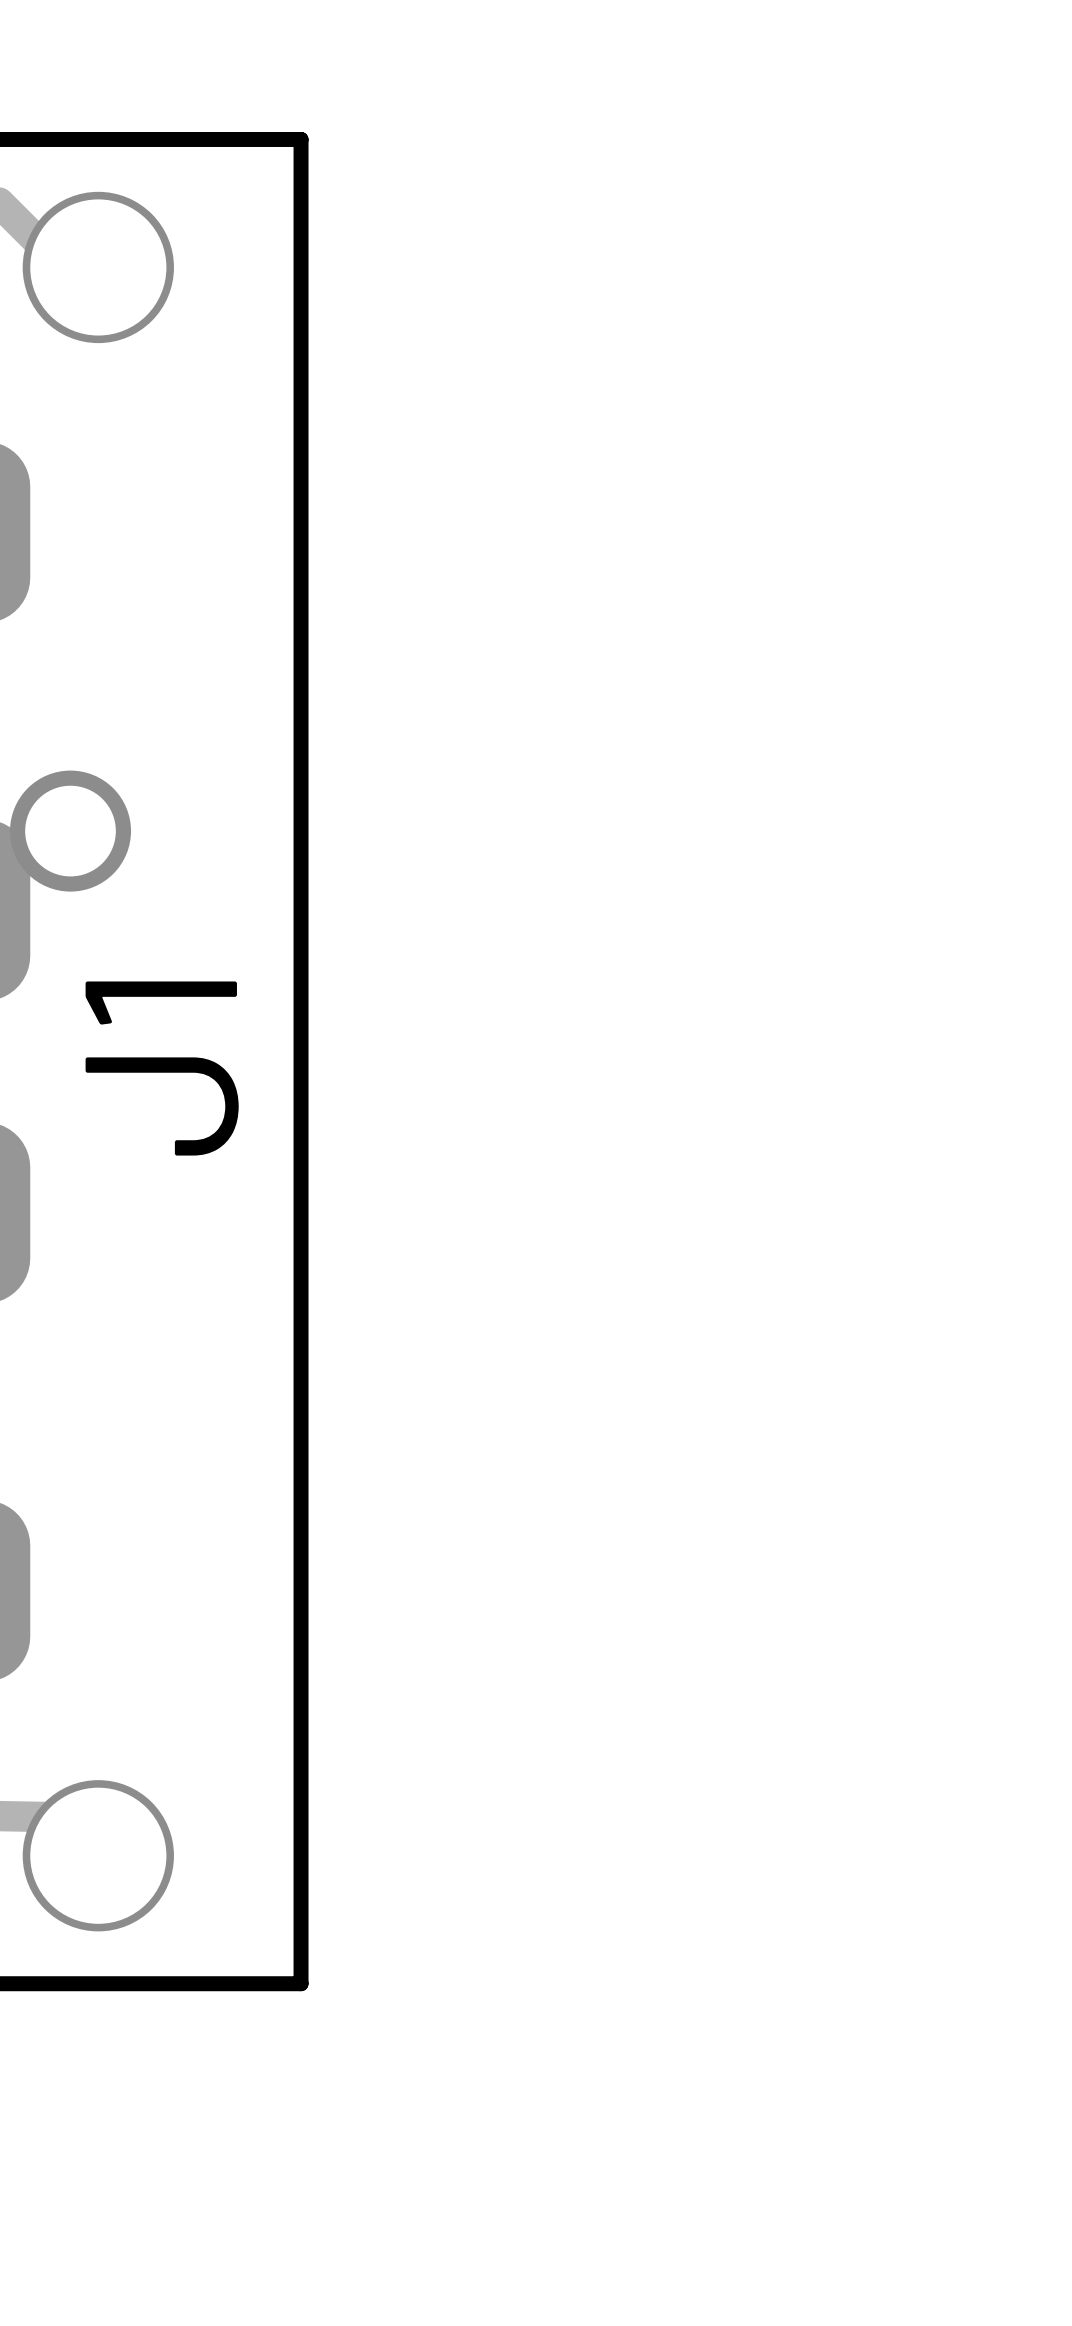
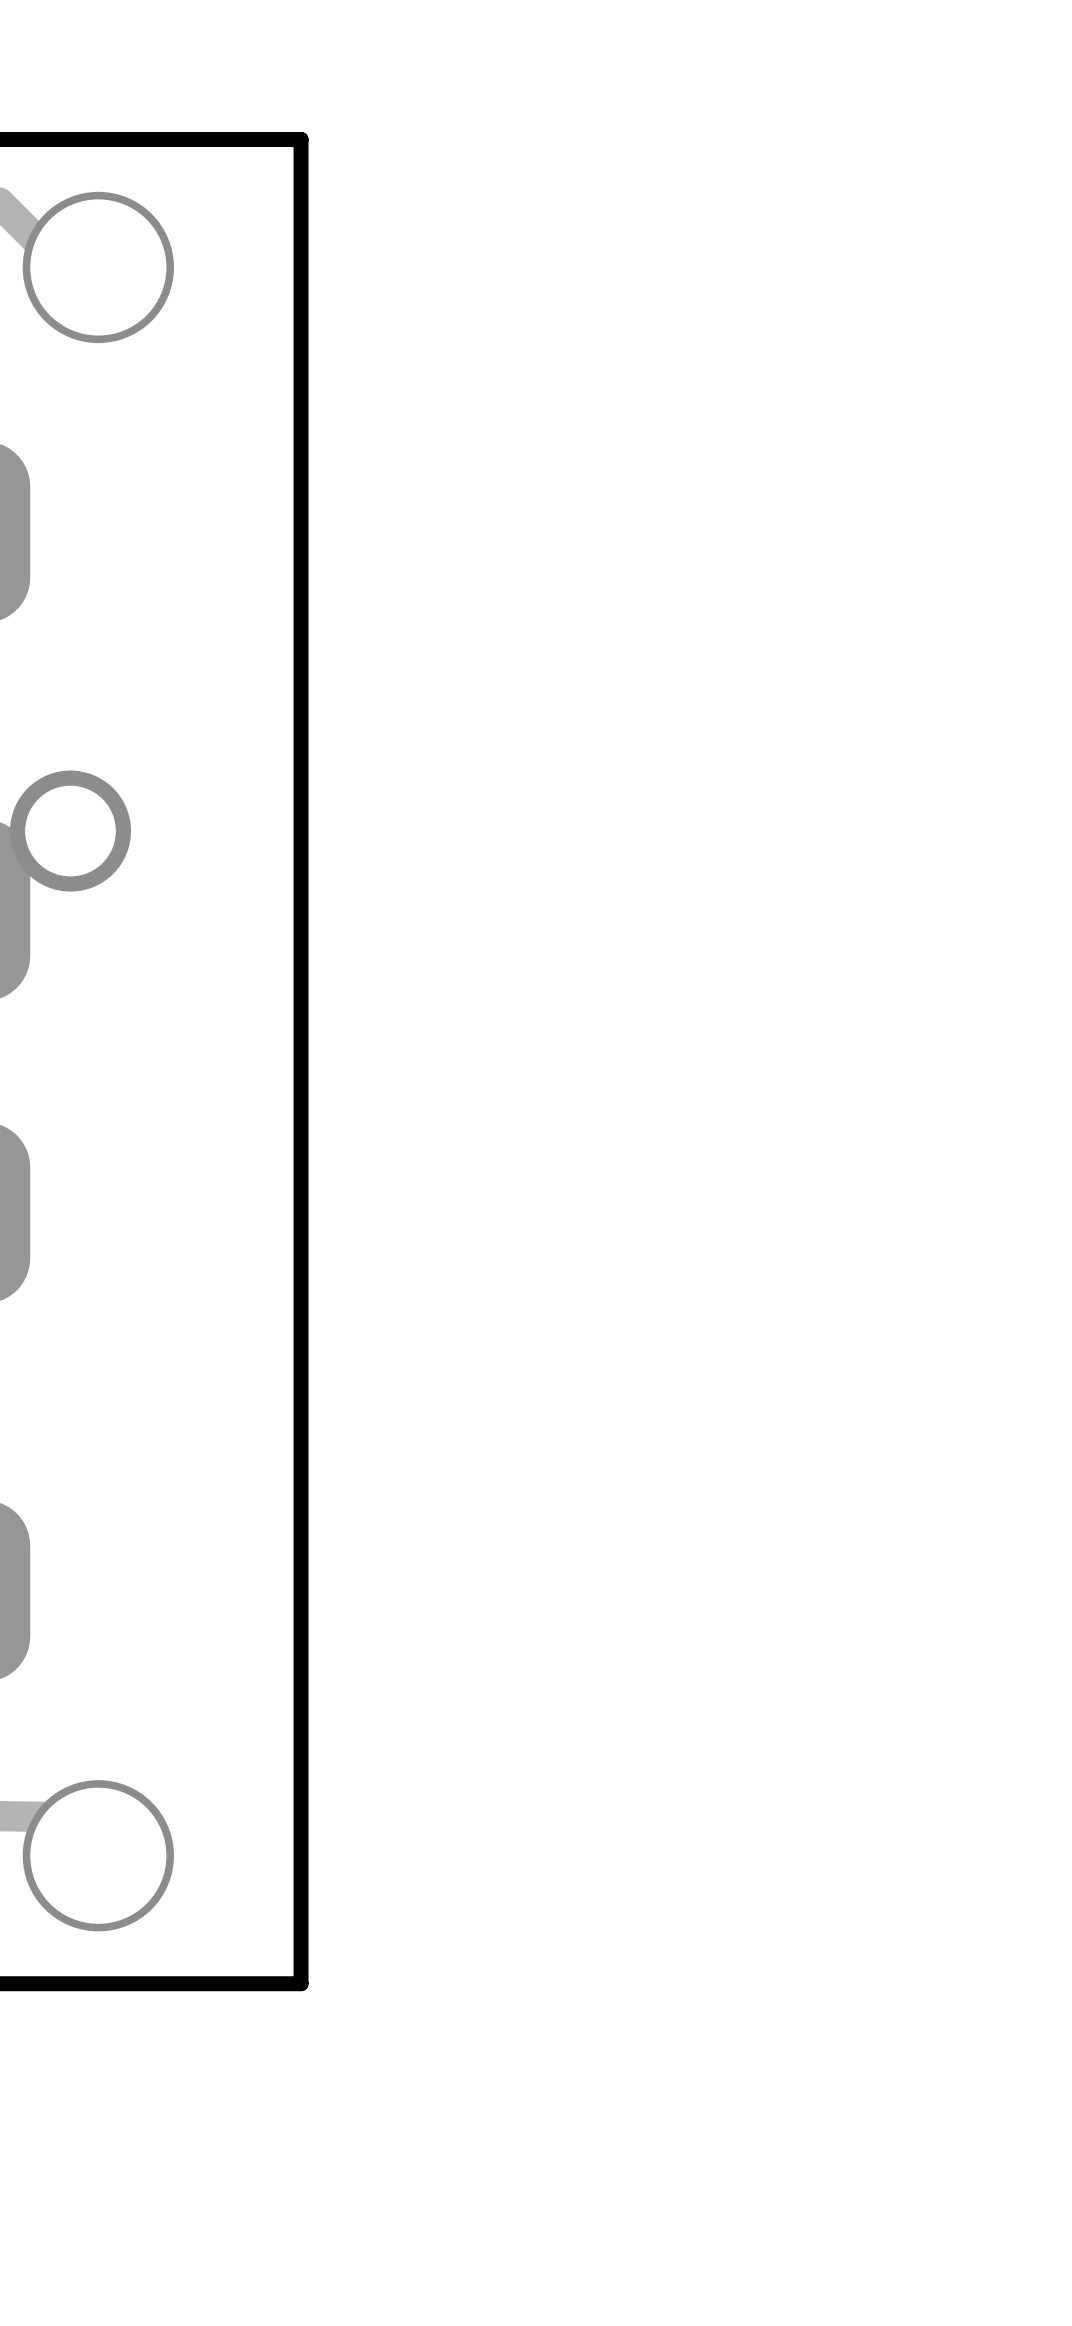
text: J1 (162, 1068) -> none

